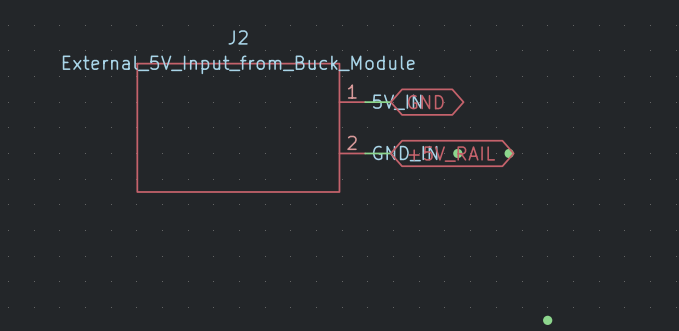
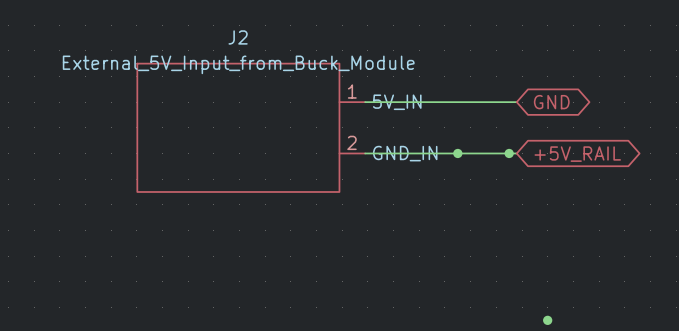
wire: none -> (390, 102) (516, 102)
global label position: GND (425, 102) -> GND (551, 102)
wire: none -> (390, 153) (516, 153)
global label position: +5V_RAIL (451, 154) -> +5V_RAIL (577, 154)

